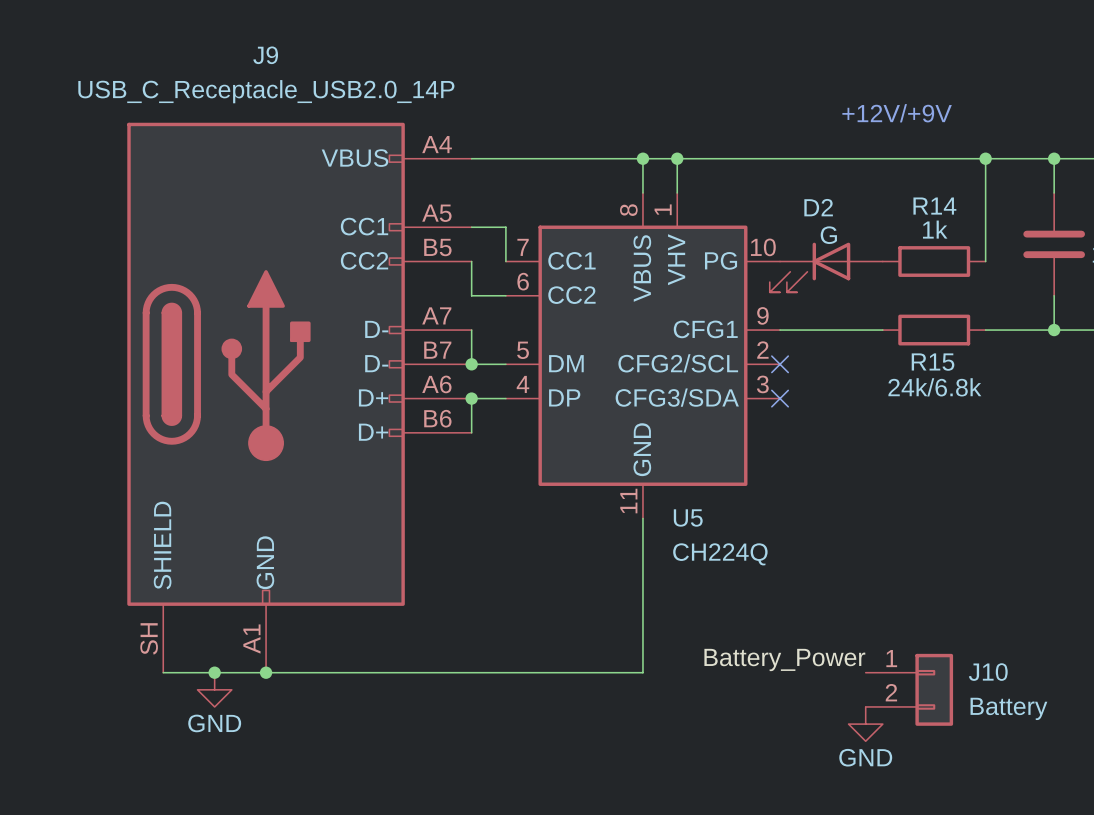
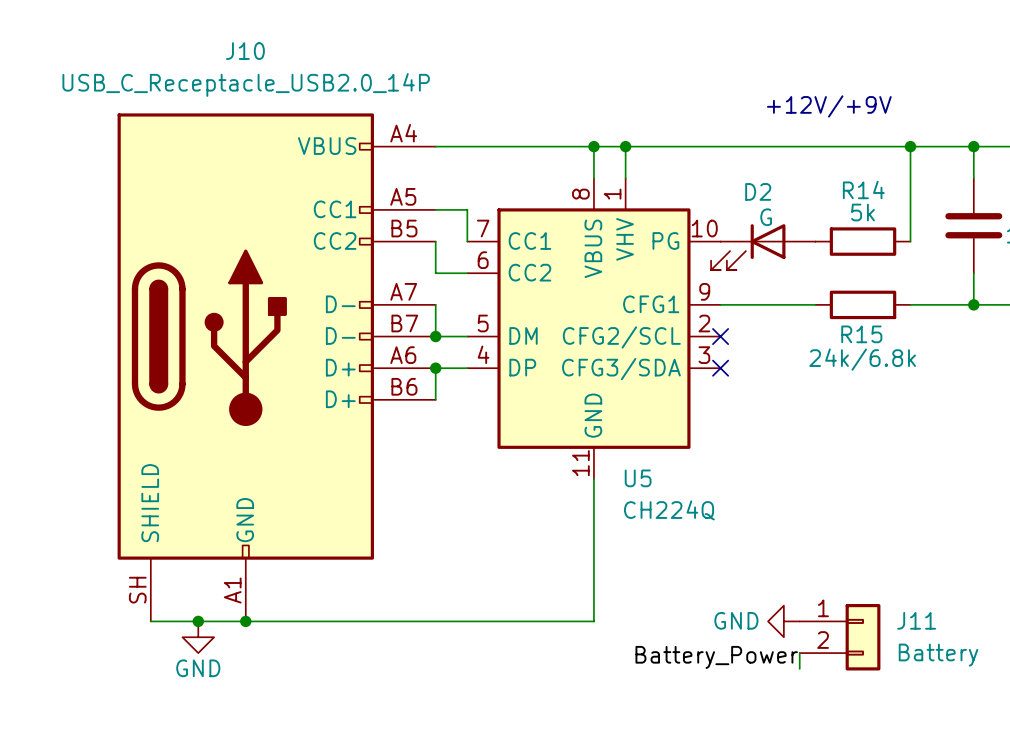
J9 name: J9 (265, 55) -> J10 (245, 51)
R14 value: 1k (935, 229) -> 5k (863, 212)
label position: Battery_Power (784, 659) -> Battery_Power (716, 657)
J10 name: J10 (988, 672) -> J11 (916, 620)
power symbol rotation: 0° (865, 724) -> 90° clockwise (783, 621)
power symbol position: GND (865, 724) -> GND (783, 621)

